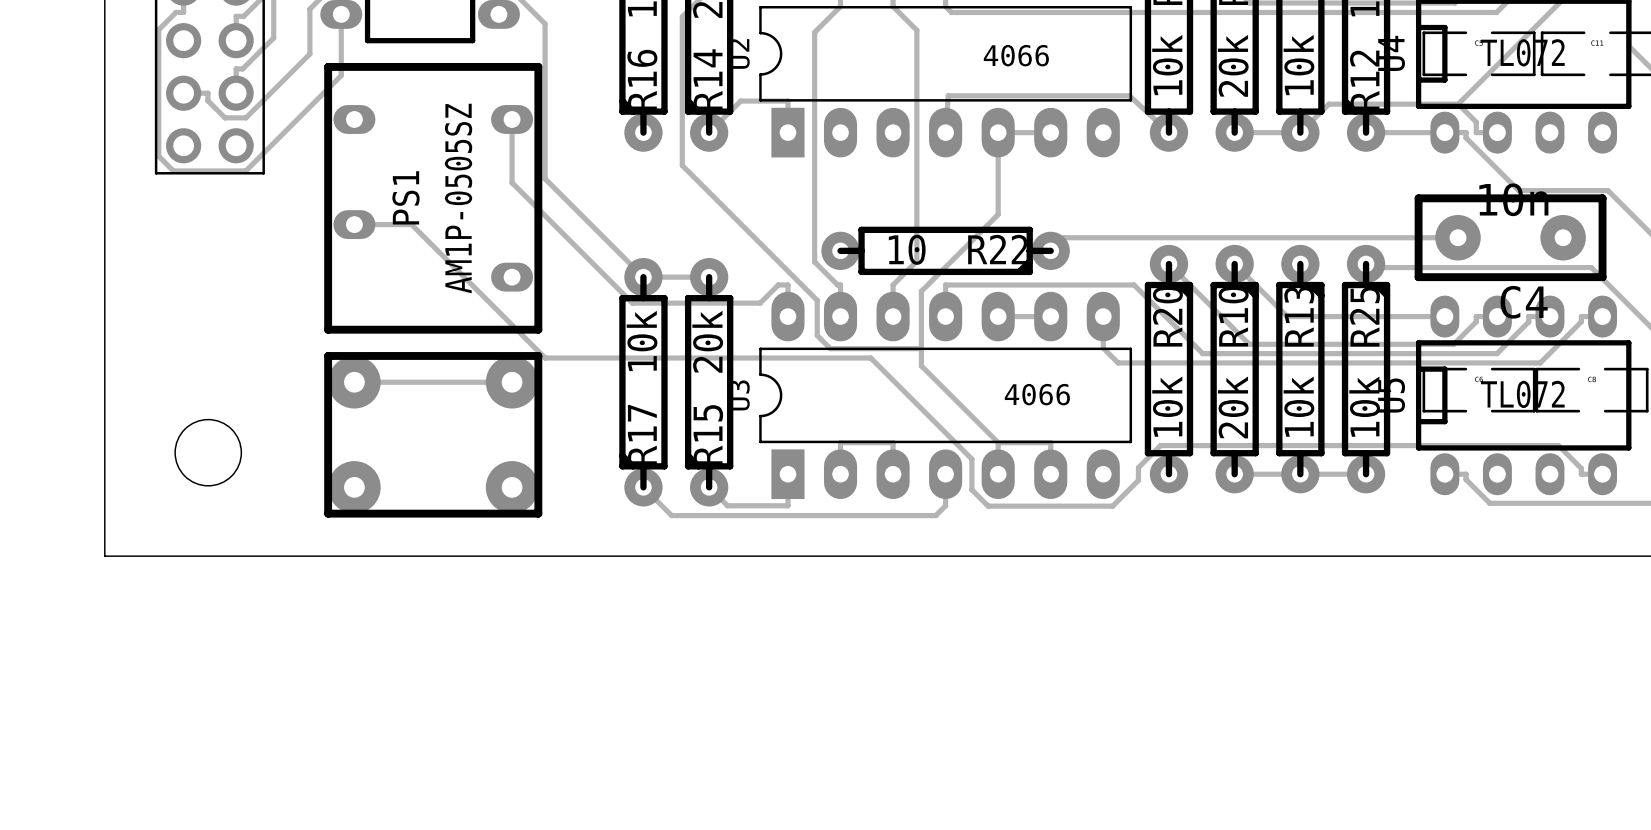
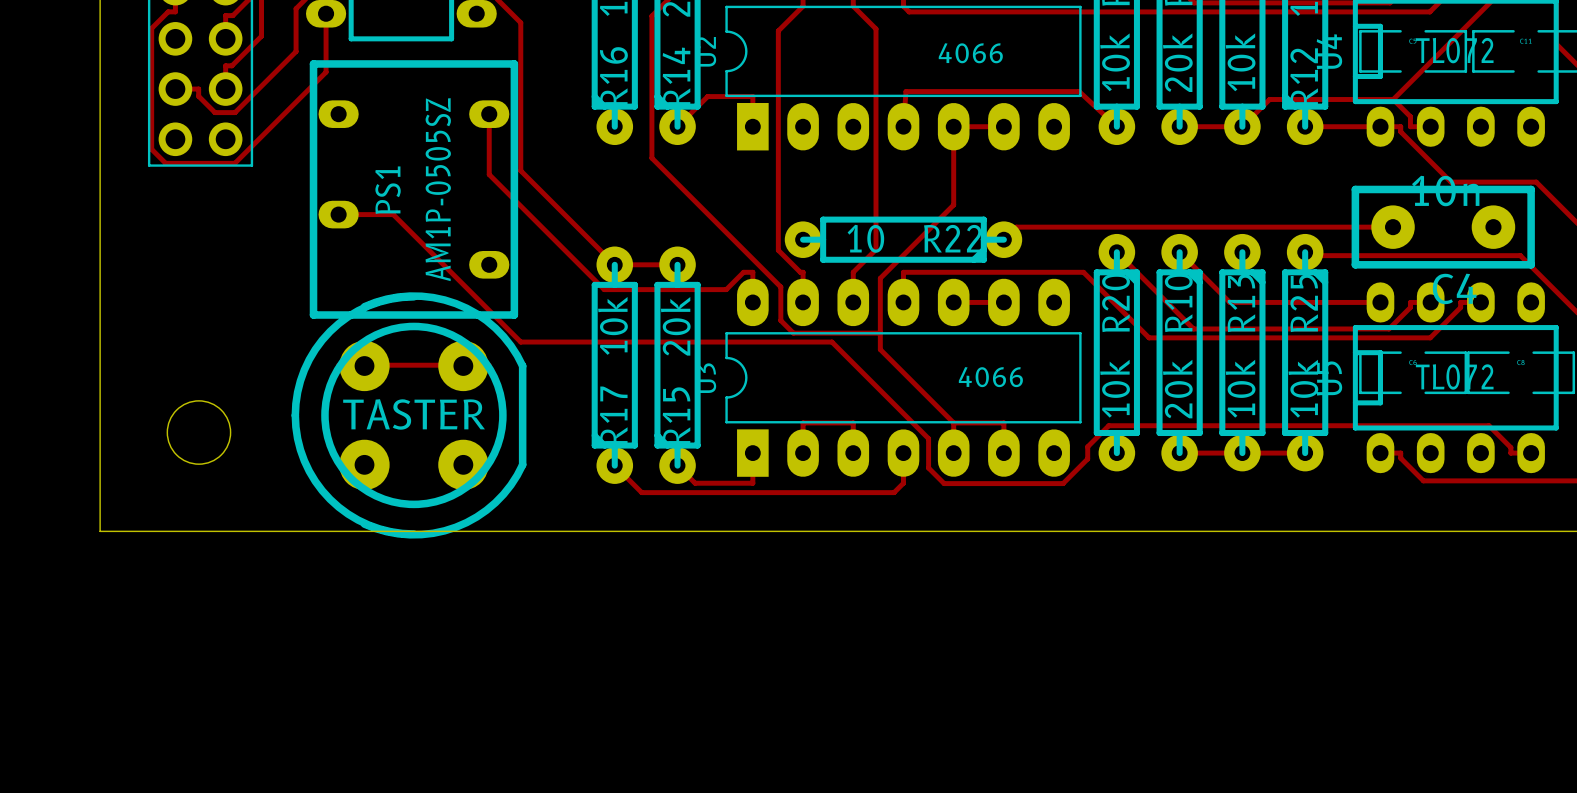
track: (1103, 316) (1103, 348) (1118, 362) (1540, 362) (1581, 321) (1581, 316) (1602, 316) -> none
part footprint: [324, 352, 543, 518] -> [291, 292, 527, 539]
part value: none -> TASTER (414, 414)

